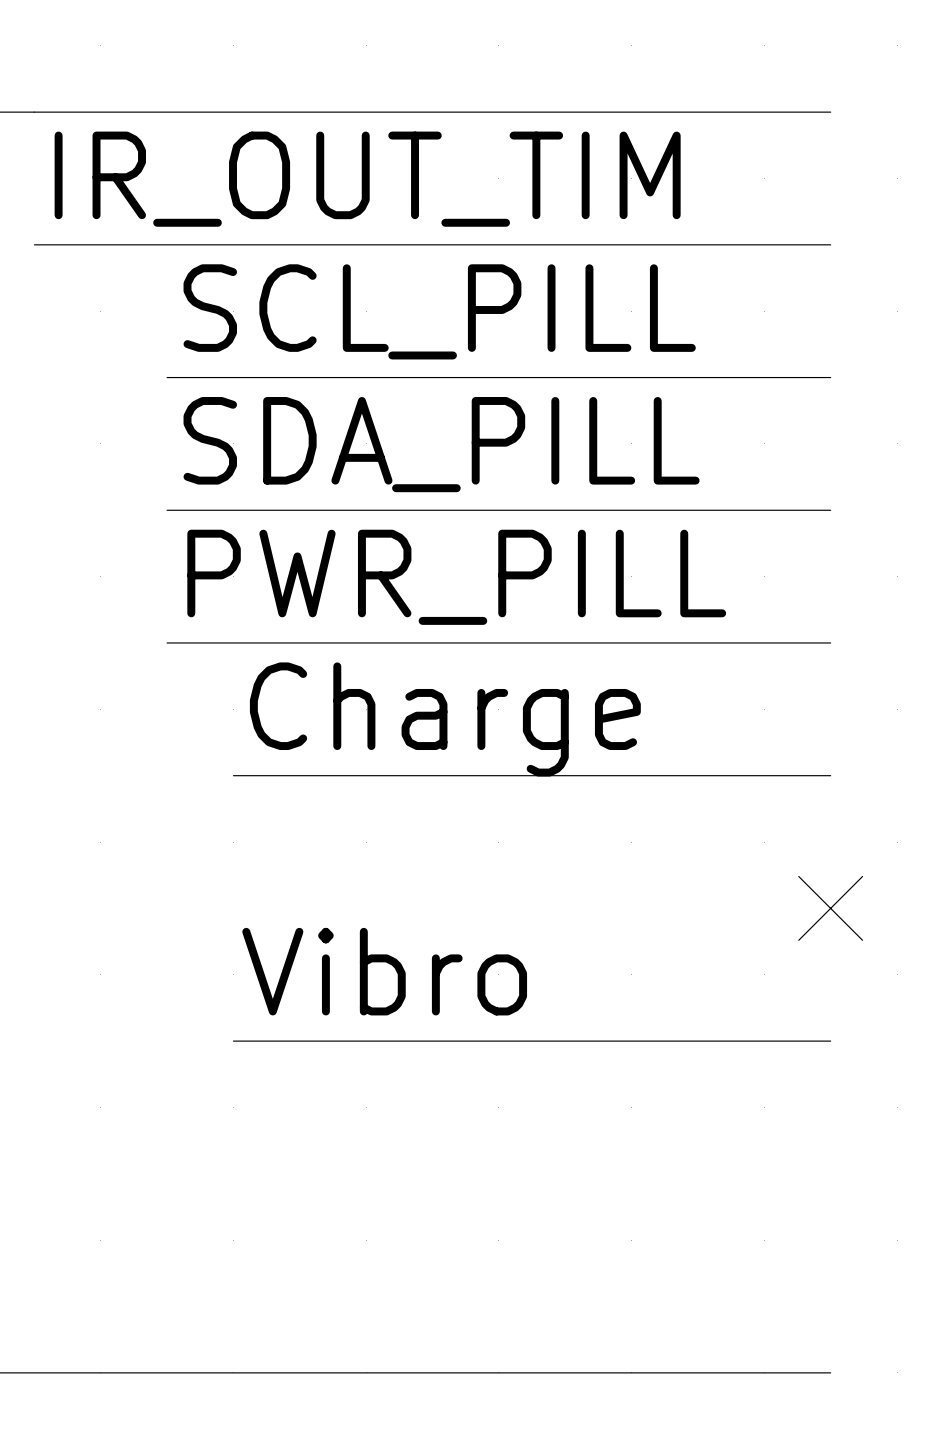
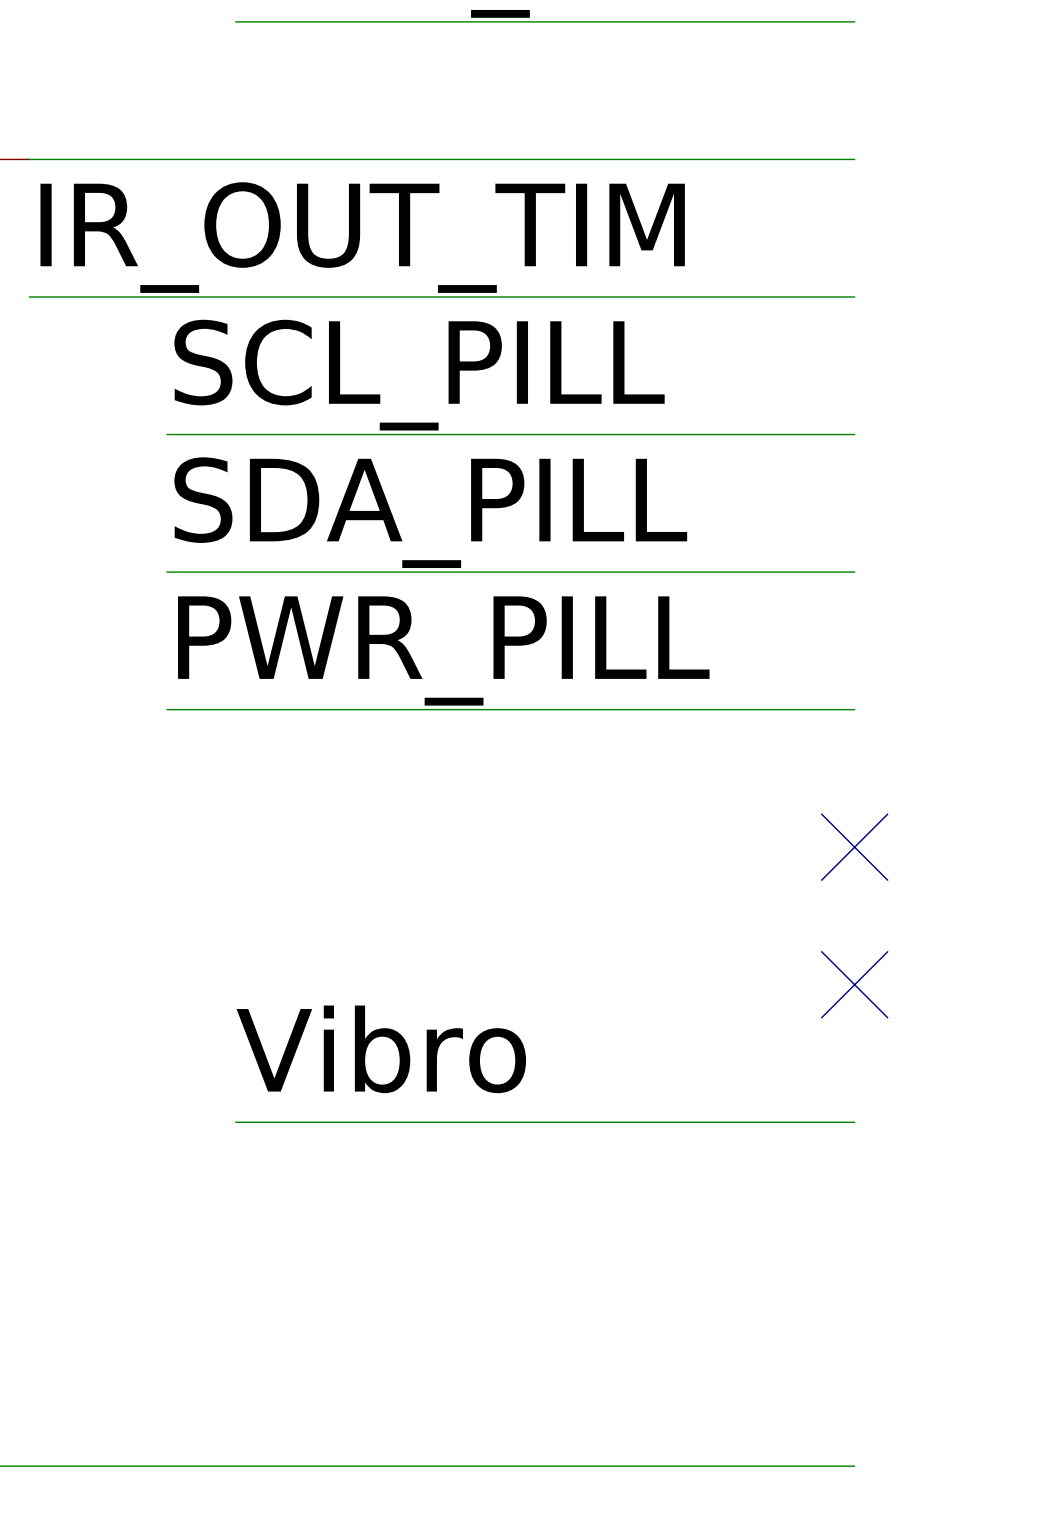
label: Charge (445, 719) -> none
wire: (233, 775) (830, 775) -> none
no-connect mark: none -> (854, 847)

